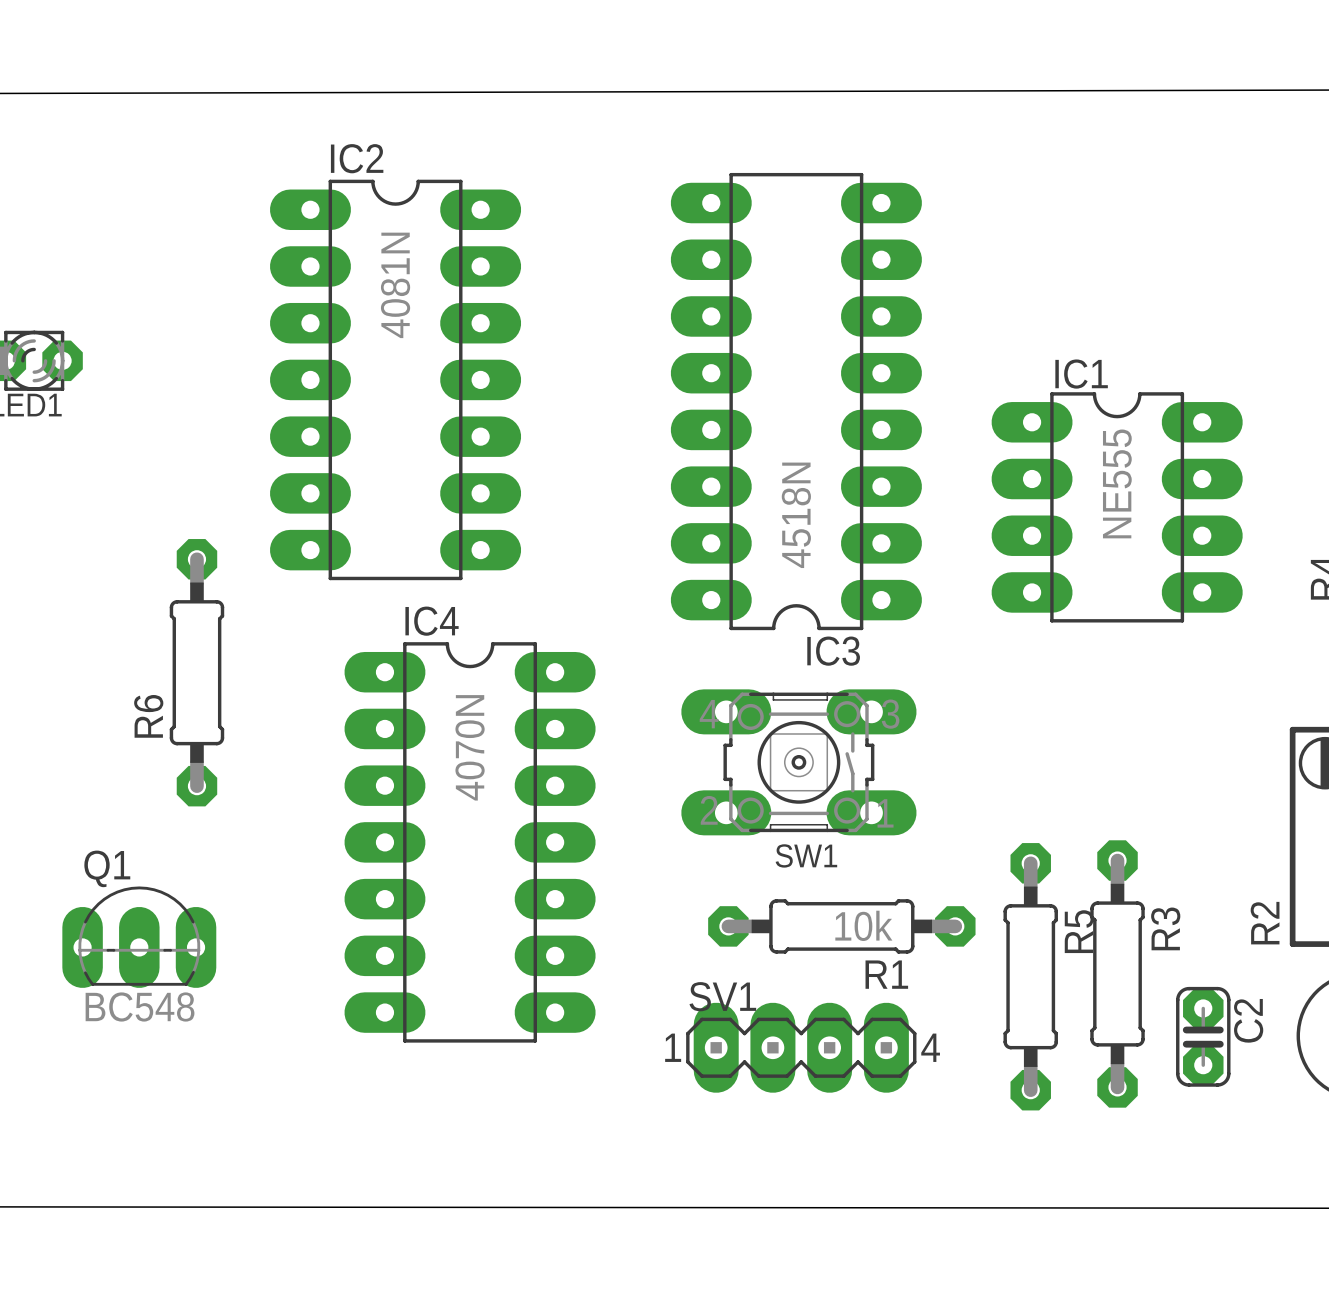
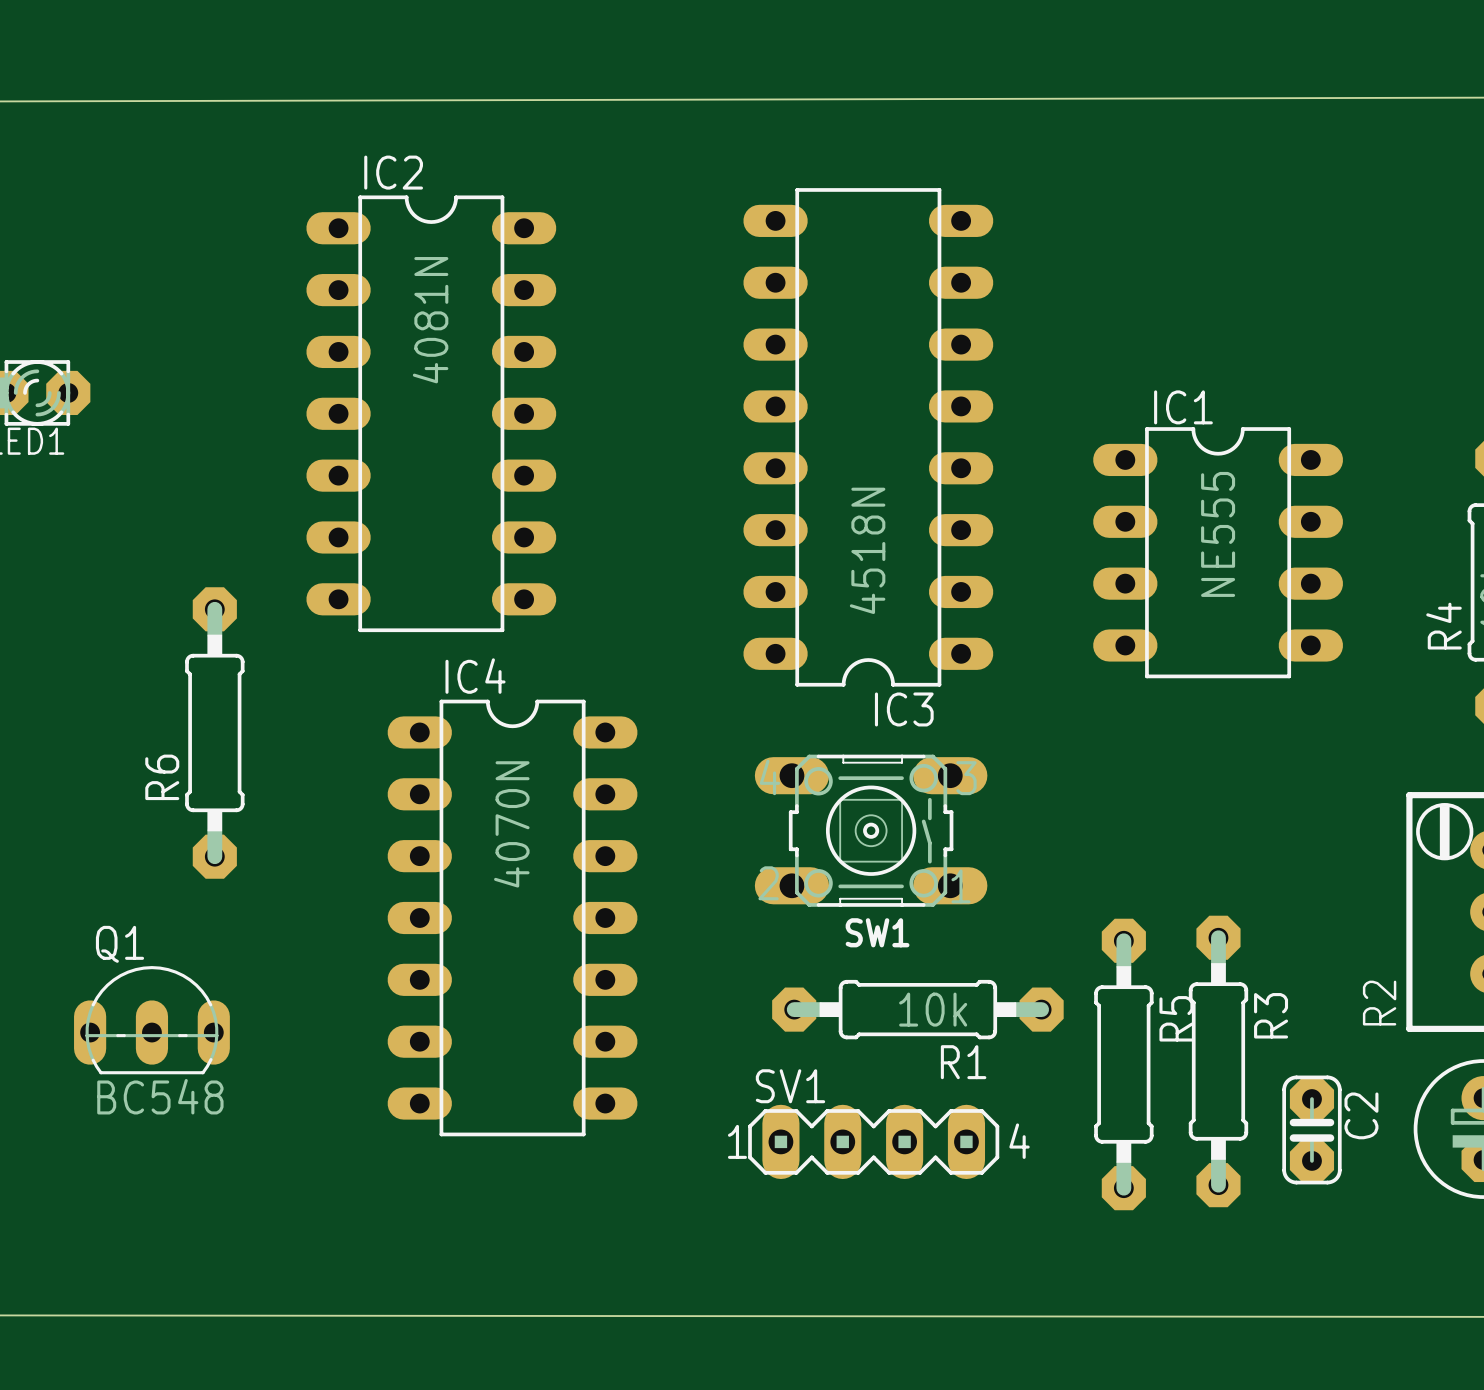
IC3 footprint: [670, 172, 922, 631] -> [743, 188, 994, 687]
IC2 footprint: [269, 179, 522, 581] -> [306, 195, 557, 633]
IC1 footprint: [991, 392, 1243, 623] -> [1093, 427, 1344, 679]
IC4 footprint: [344, 642, 596, 1043] -> [387, 699, 638, 1137]
SW1 footprint: [681, 689, 917, 836] -> [754, 754, 988, 907]
Q1 footprint: [62, 886, 217, 988] -> [74, 966, 230, 1075]
SV1 footprint: [686, 1002, 917, 1093] -> [748, 1104, 1000, 1180]

